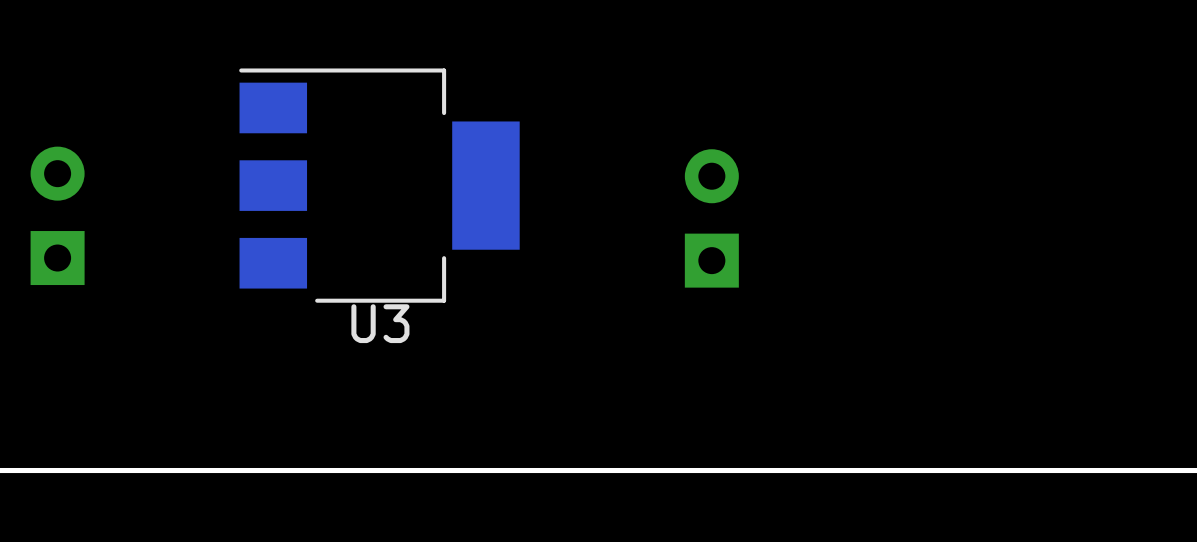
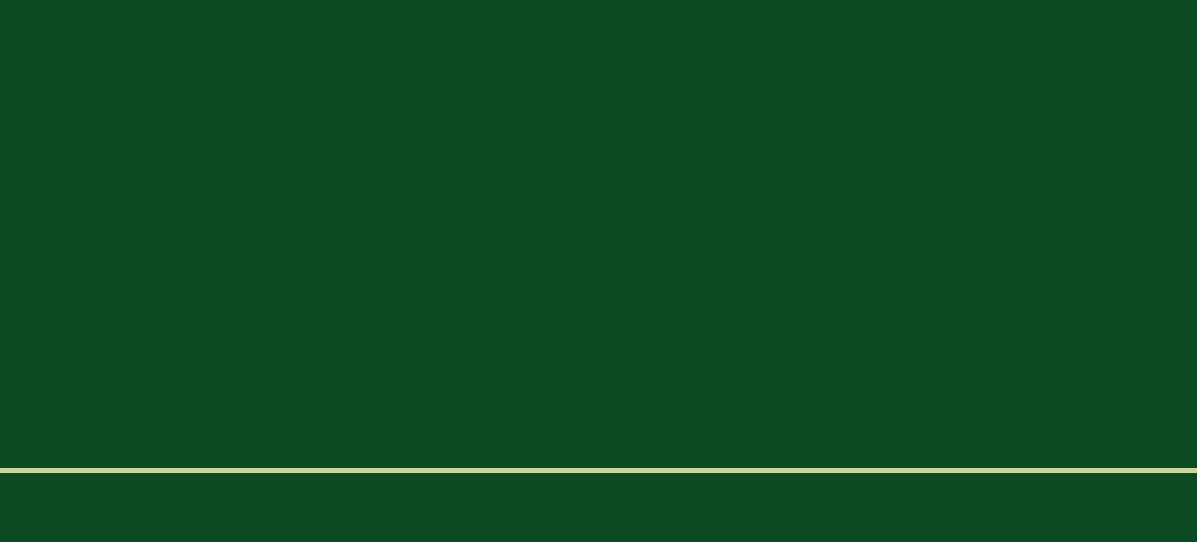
U3: (379, 185) -> none
part: (57, 215) -> none
part: (711, 218) -> none

